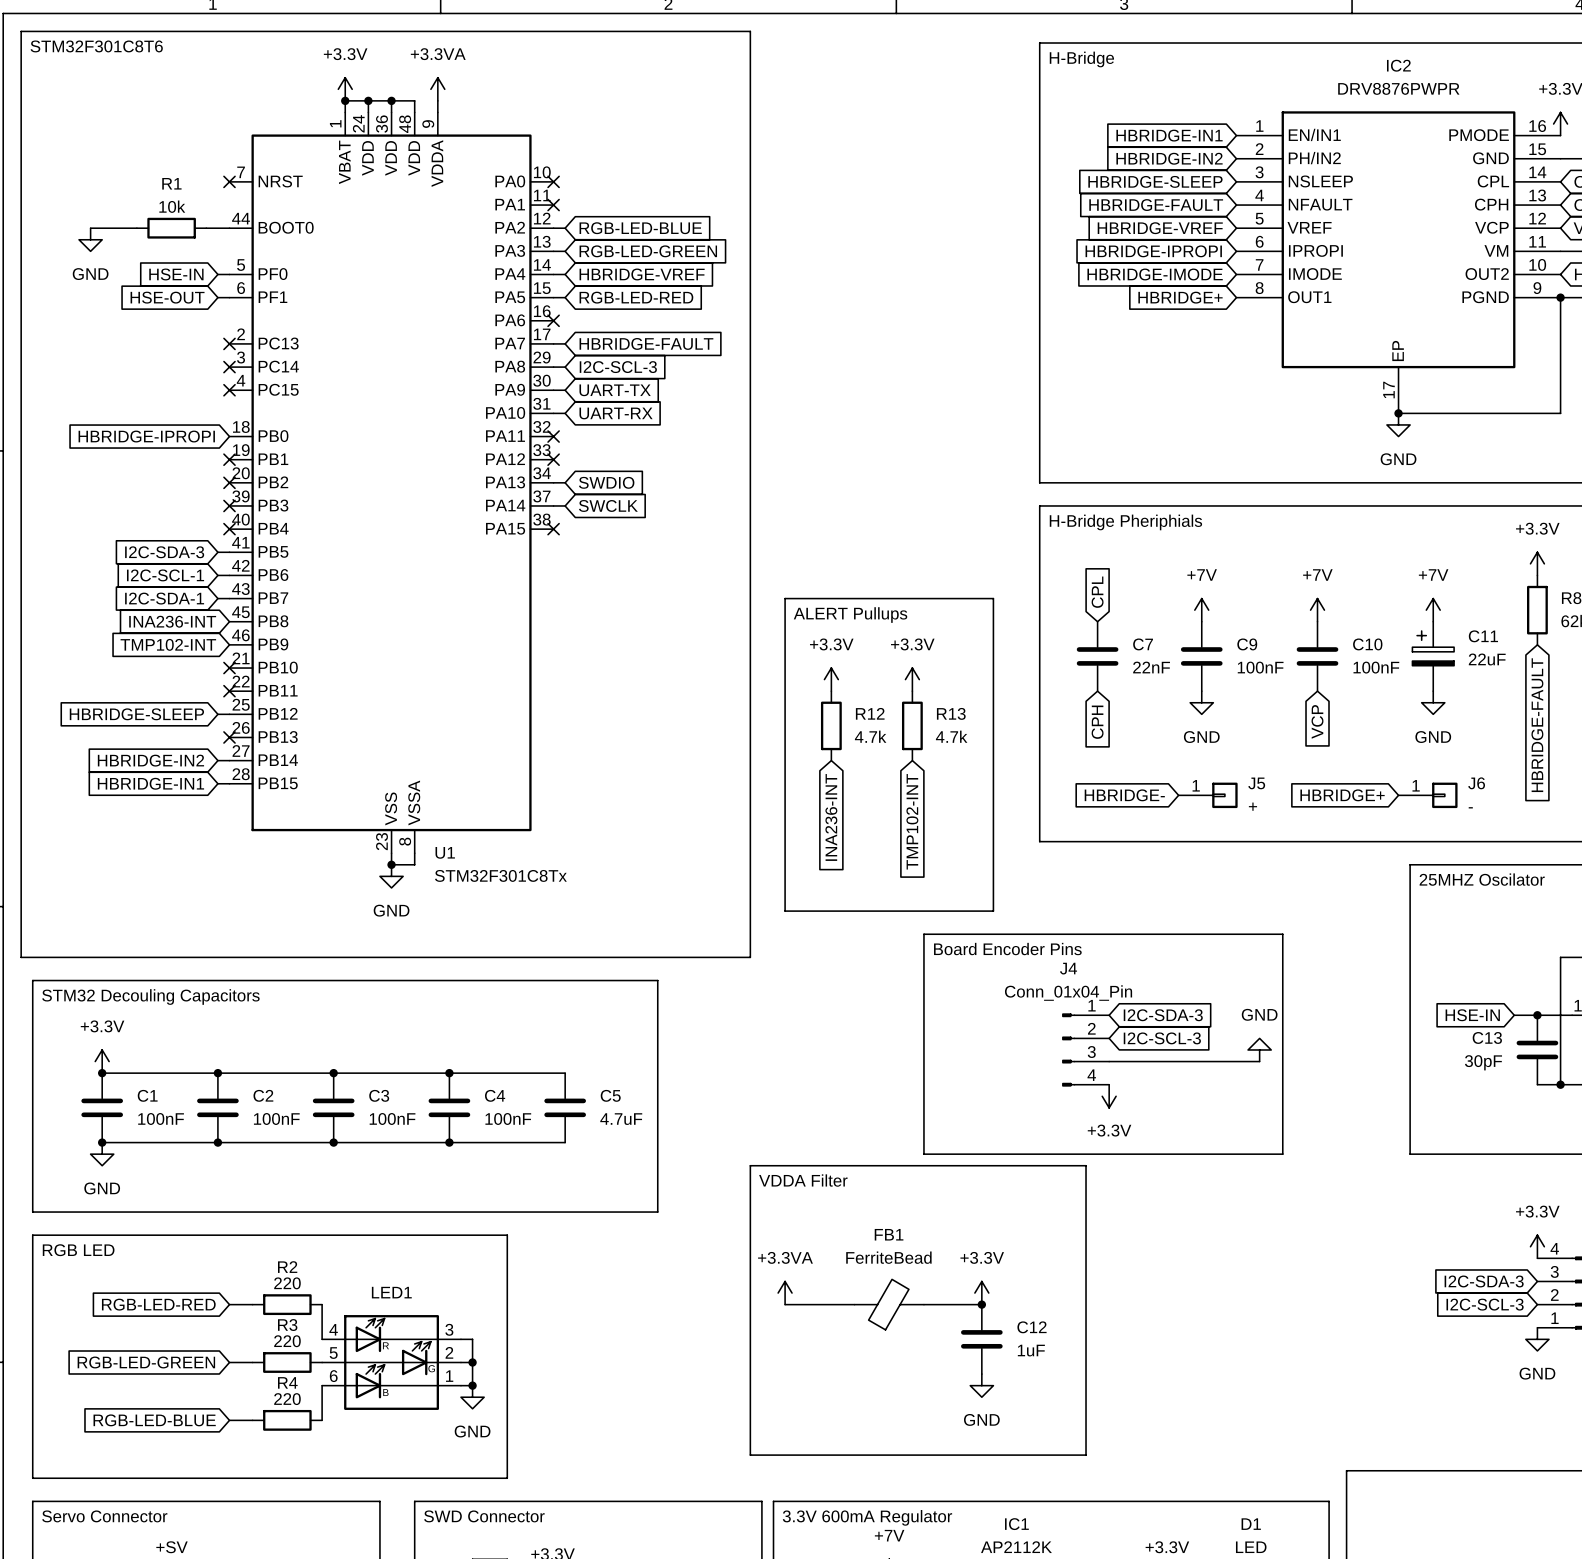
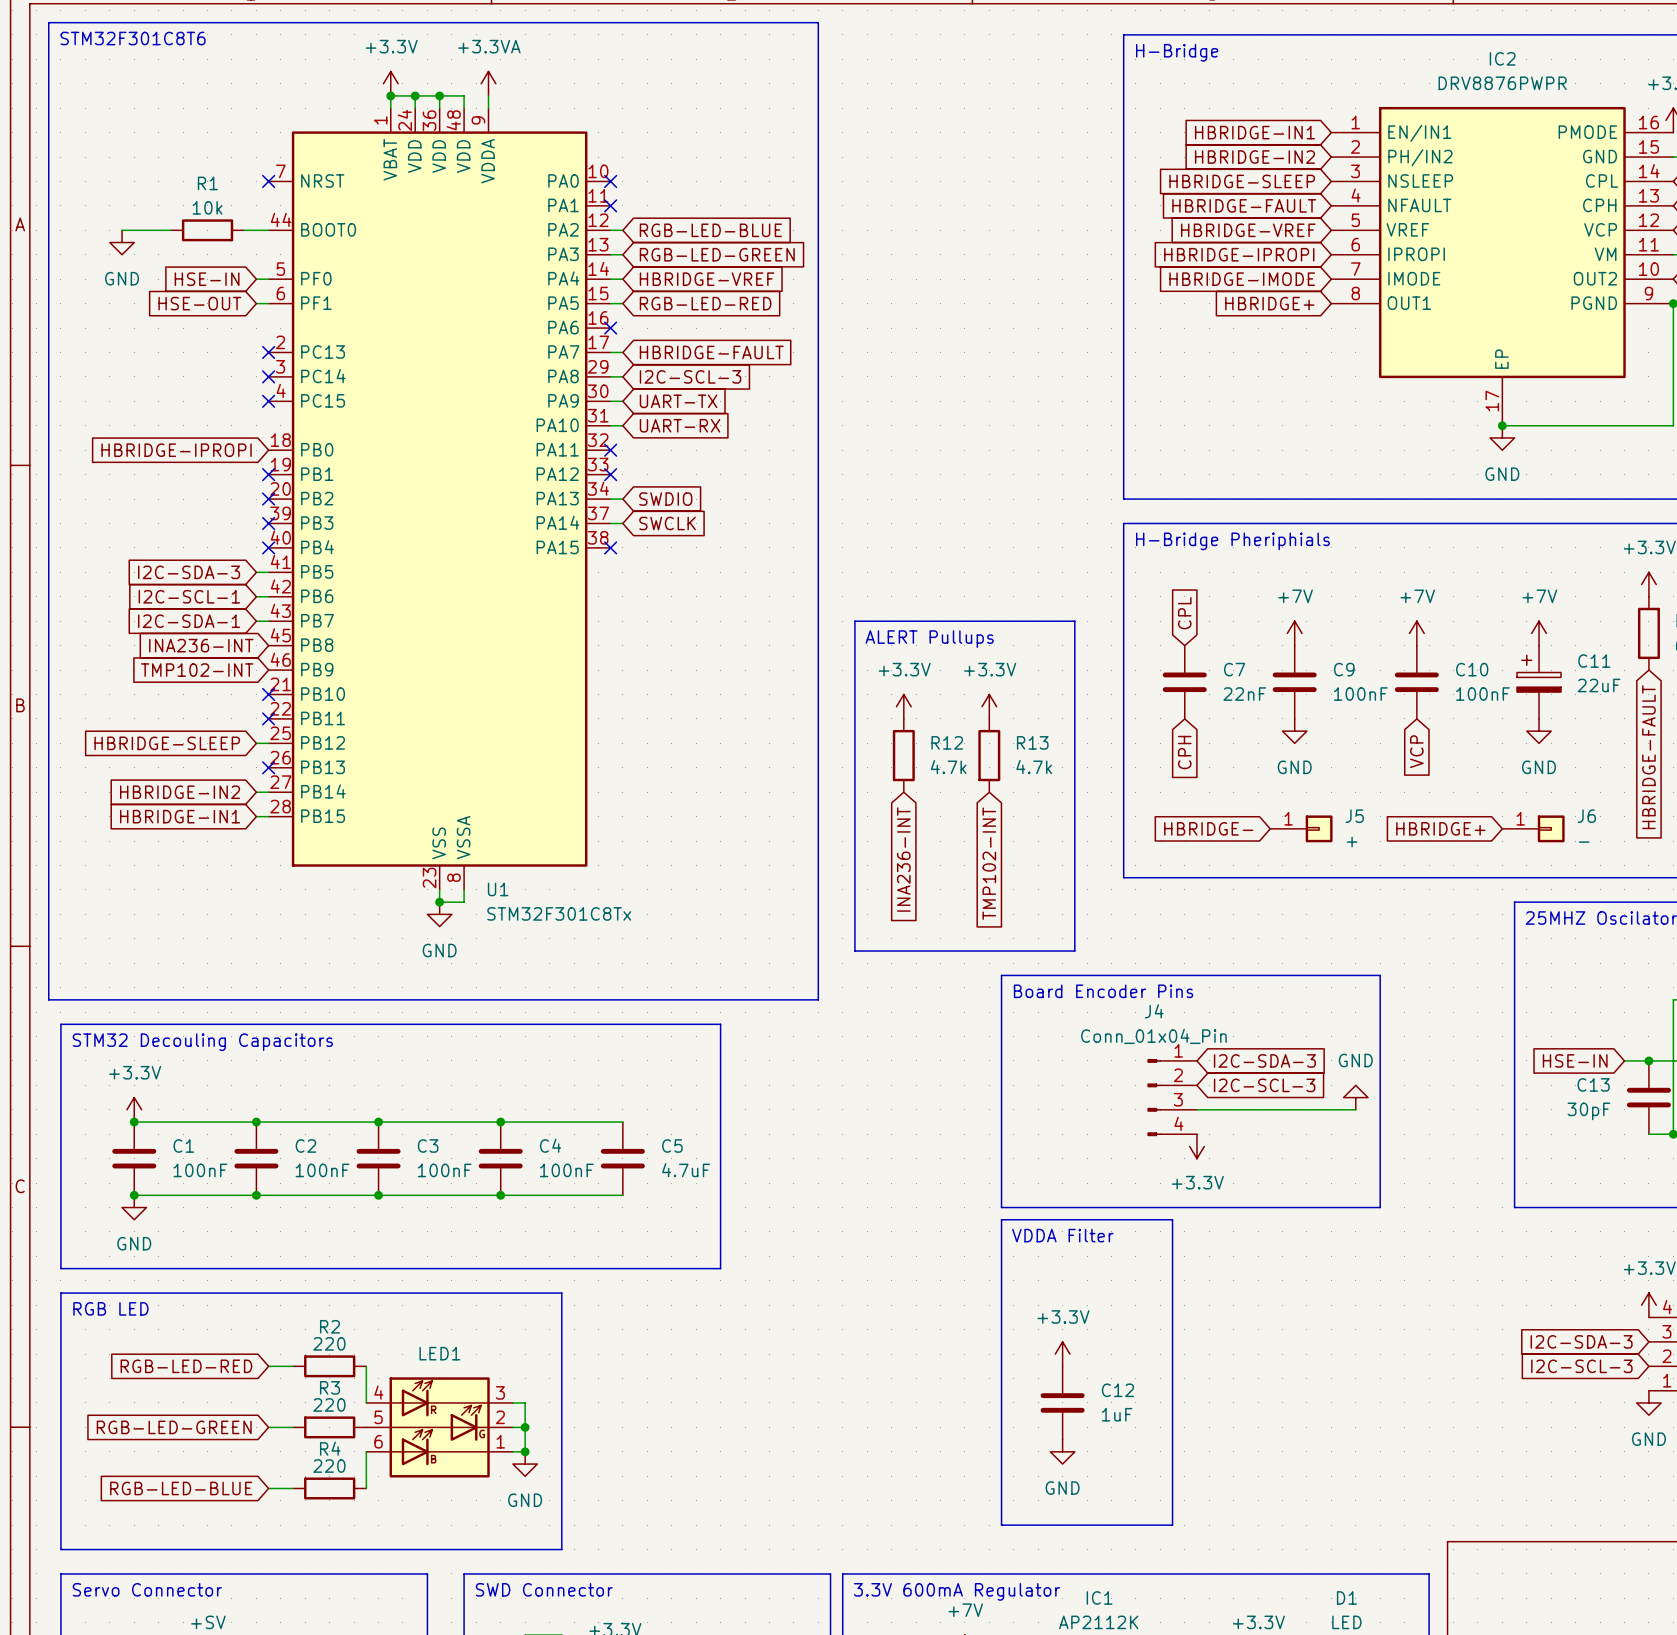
line: (923, 1165) (750, 1165) (750, 1455) (923, 1455) -> (1001, 1219) (1001, 1525)
text position: VDDA Filter (803, 1180) -> VDDA Filter (1062, 1235)
power symbol: +3.3VA (785, 1293) -> none
wire: (785, 1304) (854, 1304) -> none
FB1: FerriteBead (889, 1304) -> none
wire: (923, 1304) (981, 1304) -> none
junction: (981, 1304) -> none

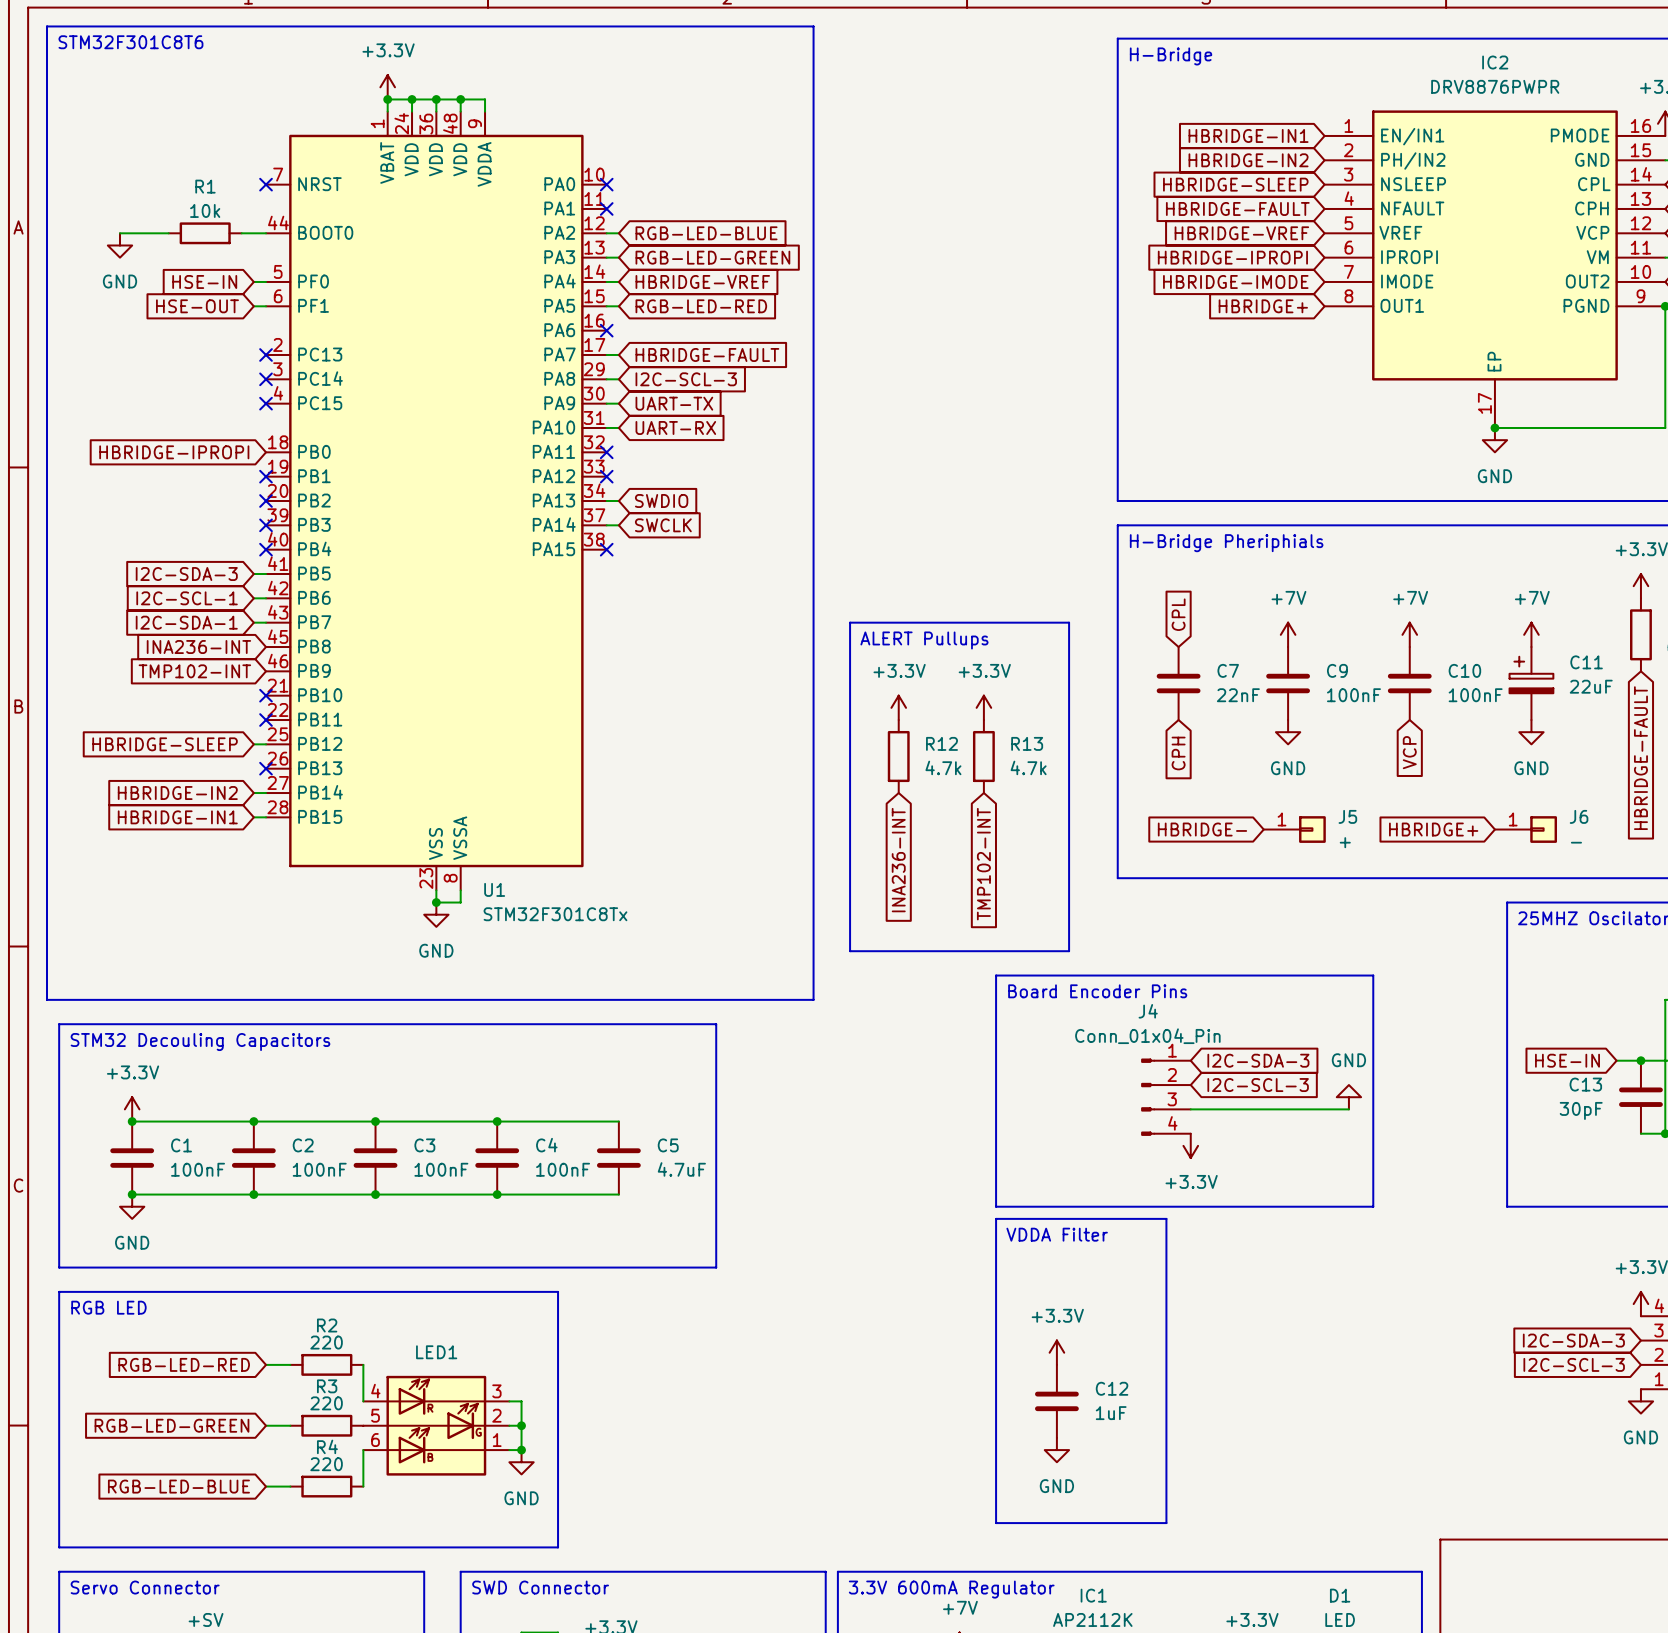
power symbol: +3.3VA (488, 83) -> none
wire: none -> (460, 99) (485, 99)
junction: none -> (460, 99)

